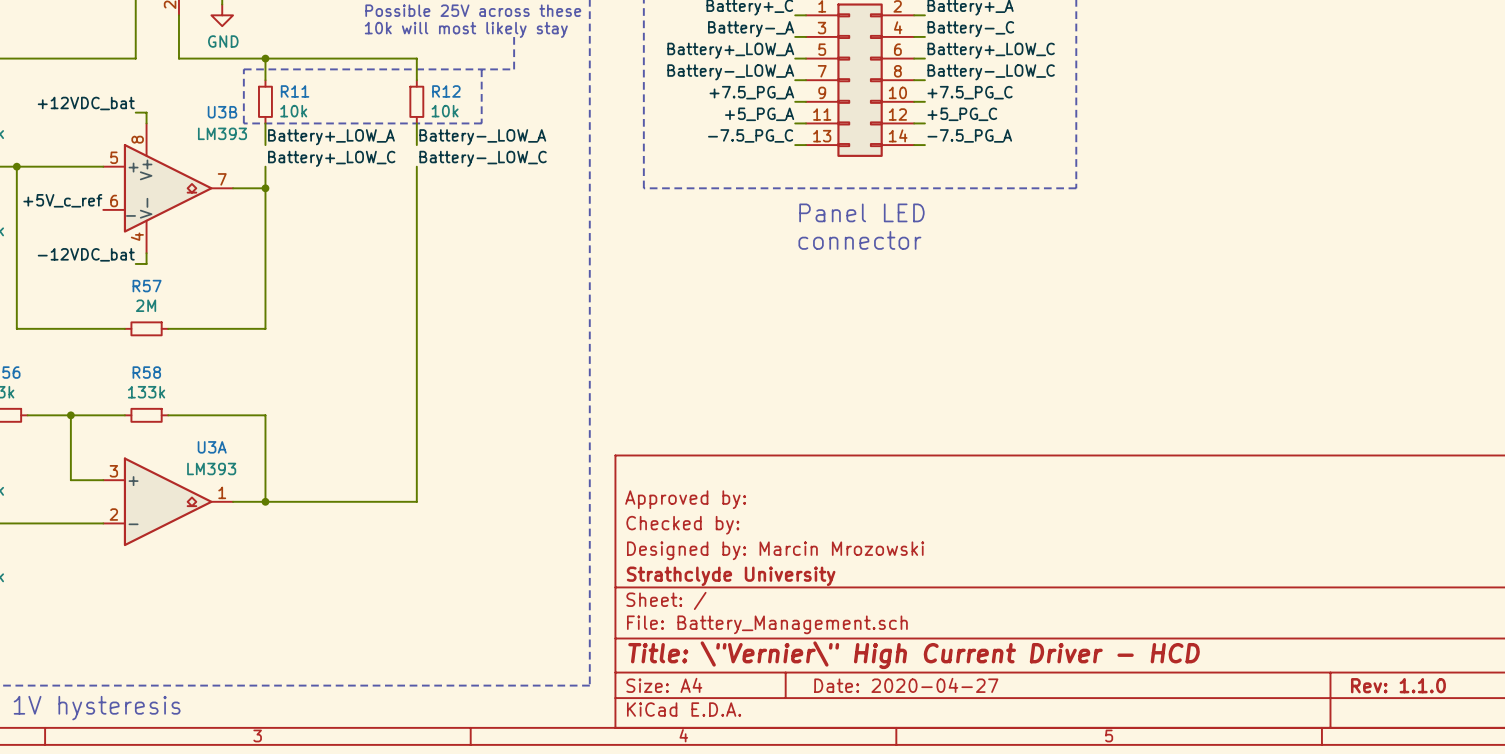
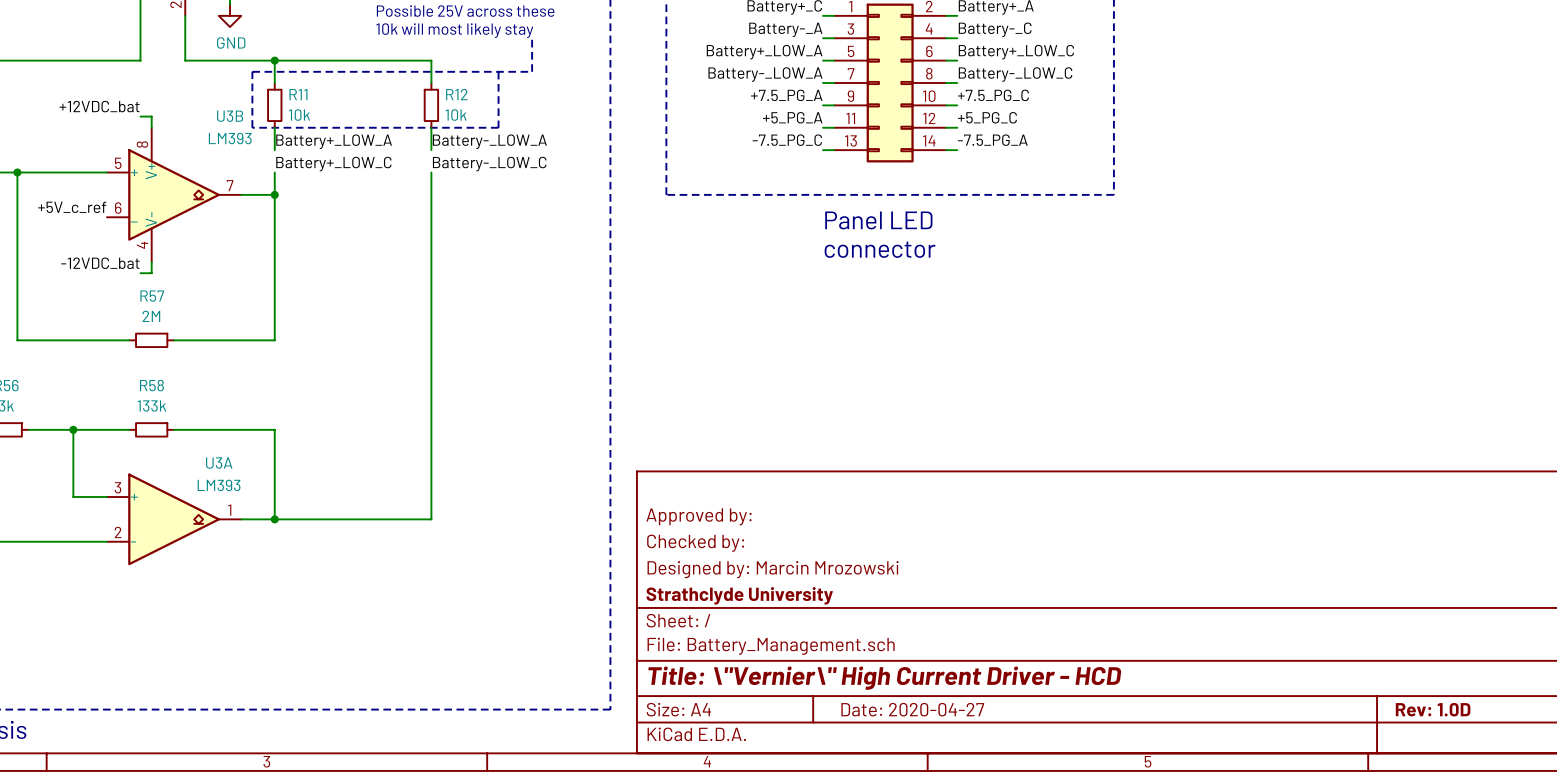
title block: Rev: 1.1.0 (1398, 685) -> Rev: 1.0D (1433, 709)

